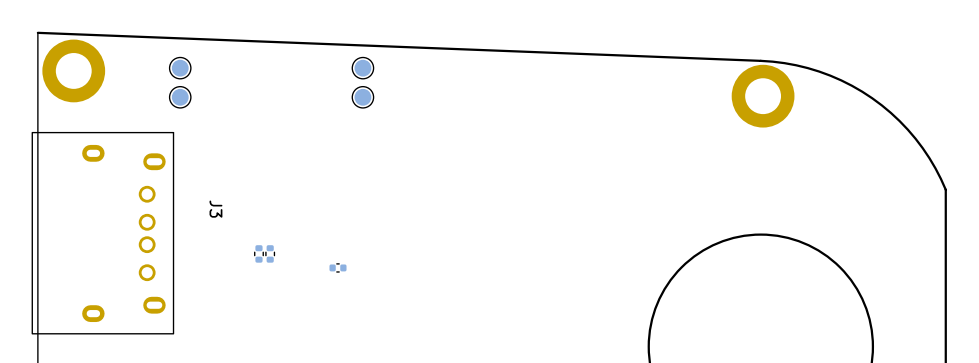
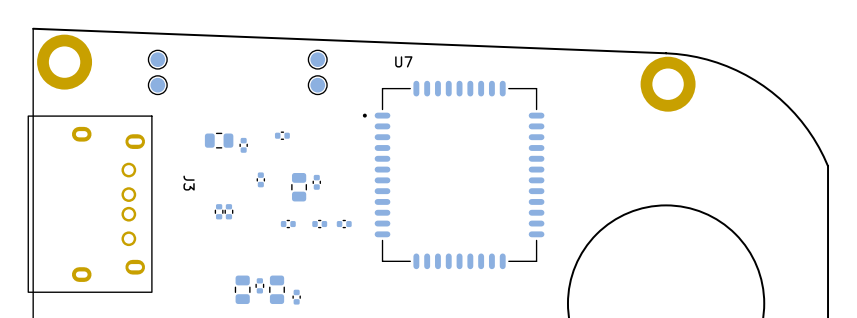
part: none -> (282, 135)
part: none -> (219, 140)
part: none -> (243, 145)
U7: none -> (453, 174)
part: none -> (260, 179)
part: none -> (316, 182)
part: none -> (299, 187)
part: none -> (219, 211)
part: none -> (228, 211)
part: (258, 253) -> none
part: (270, 253) -> none
part: none -> (288, 224)
part: none -> (319, 224)
part: none -> (344, 224)
part: (337, 267) -> none
part: none -> (259, 285)
part: none -> (242, 289)
part: none -> (277, 289)
part: none -> (296, 297)

